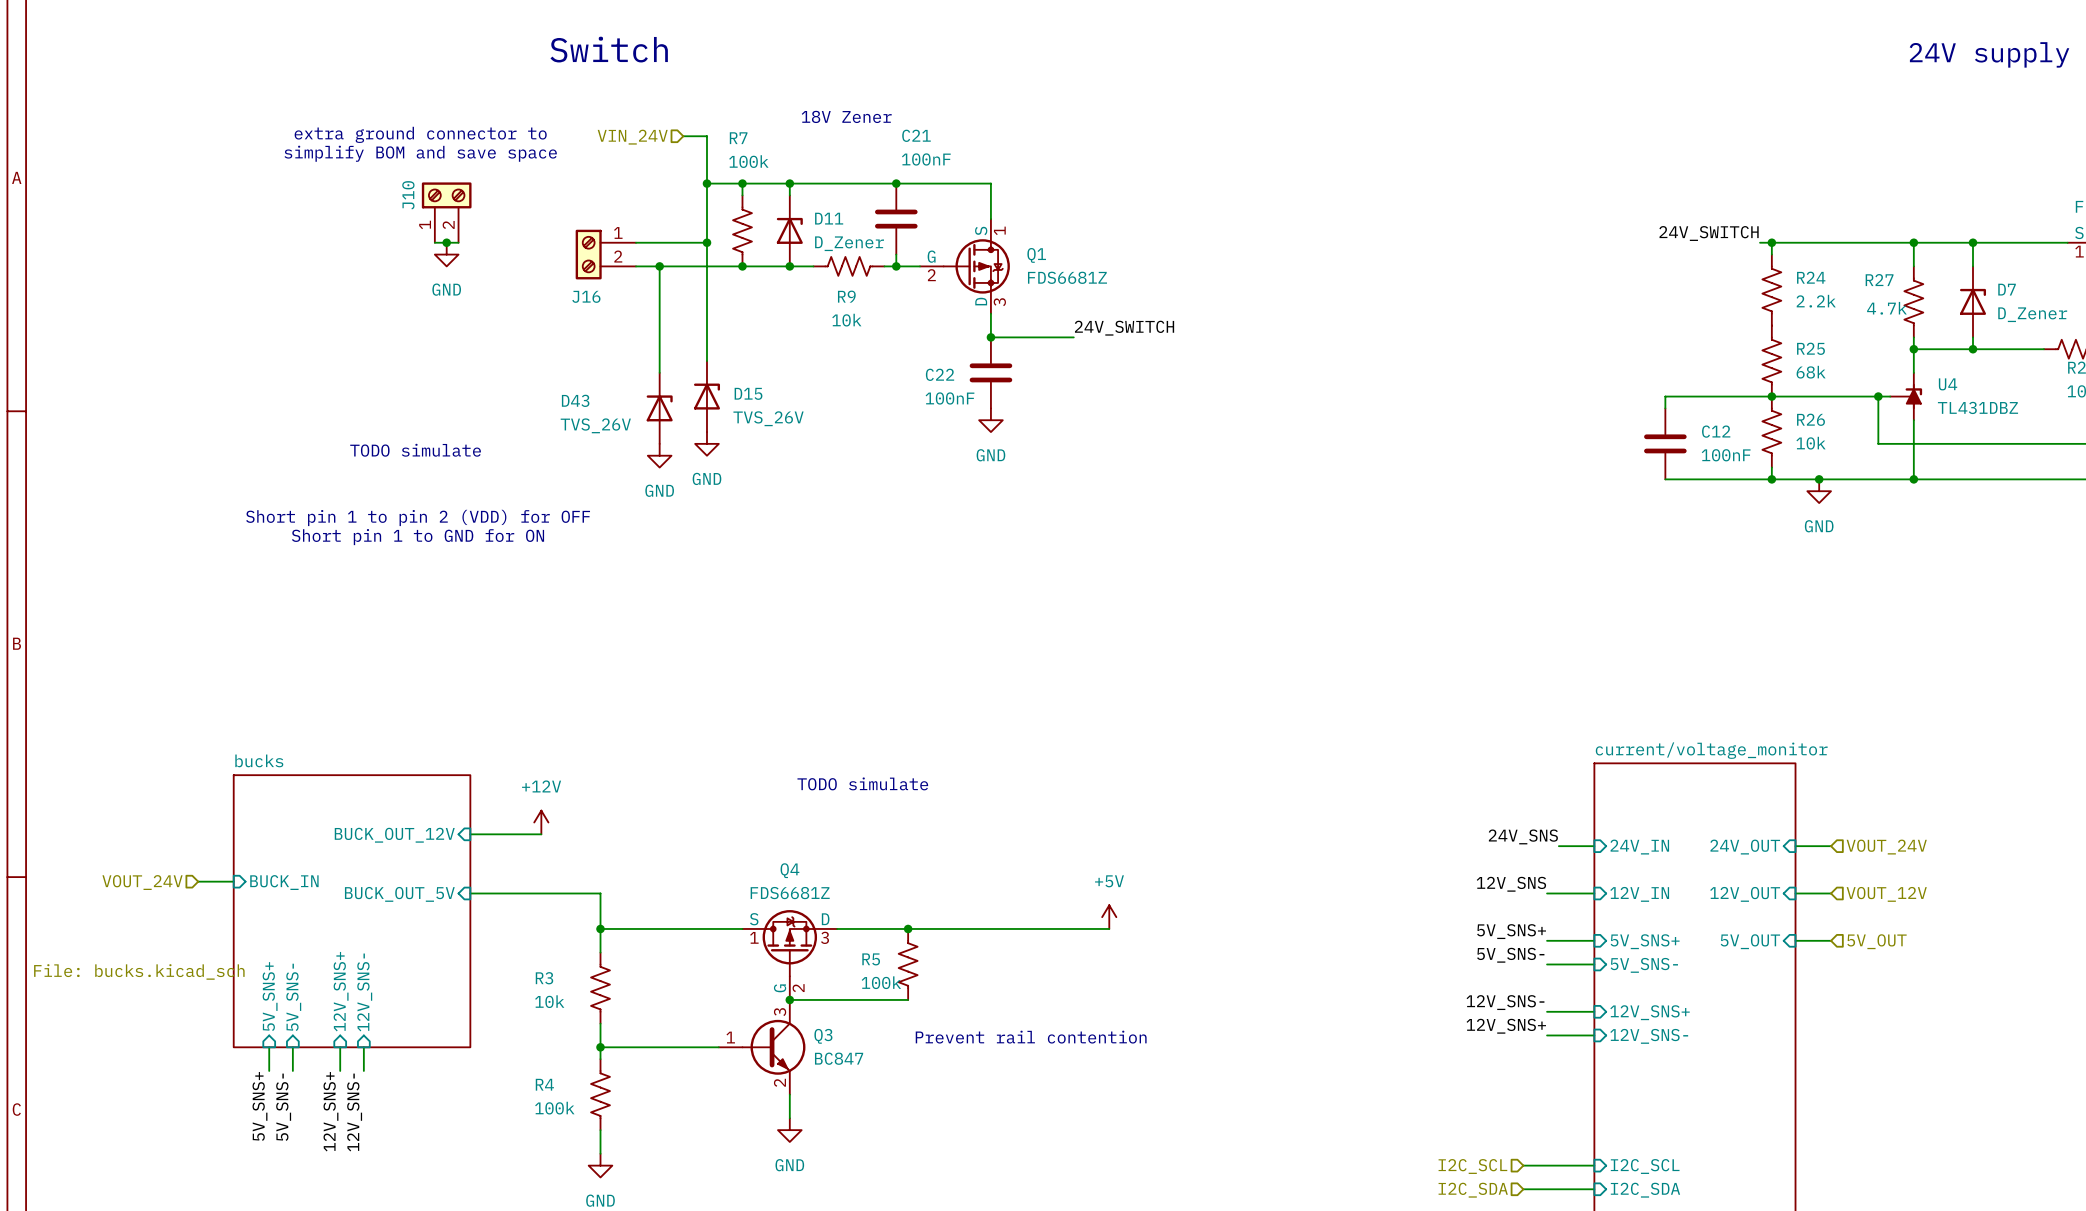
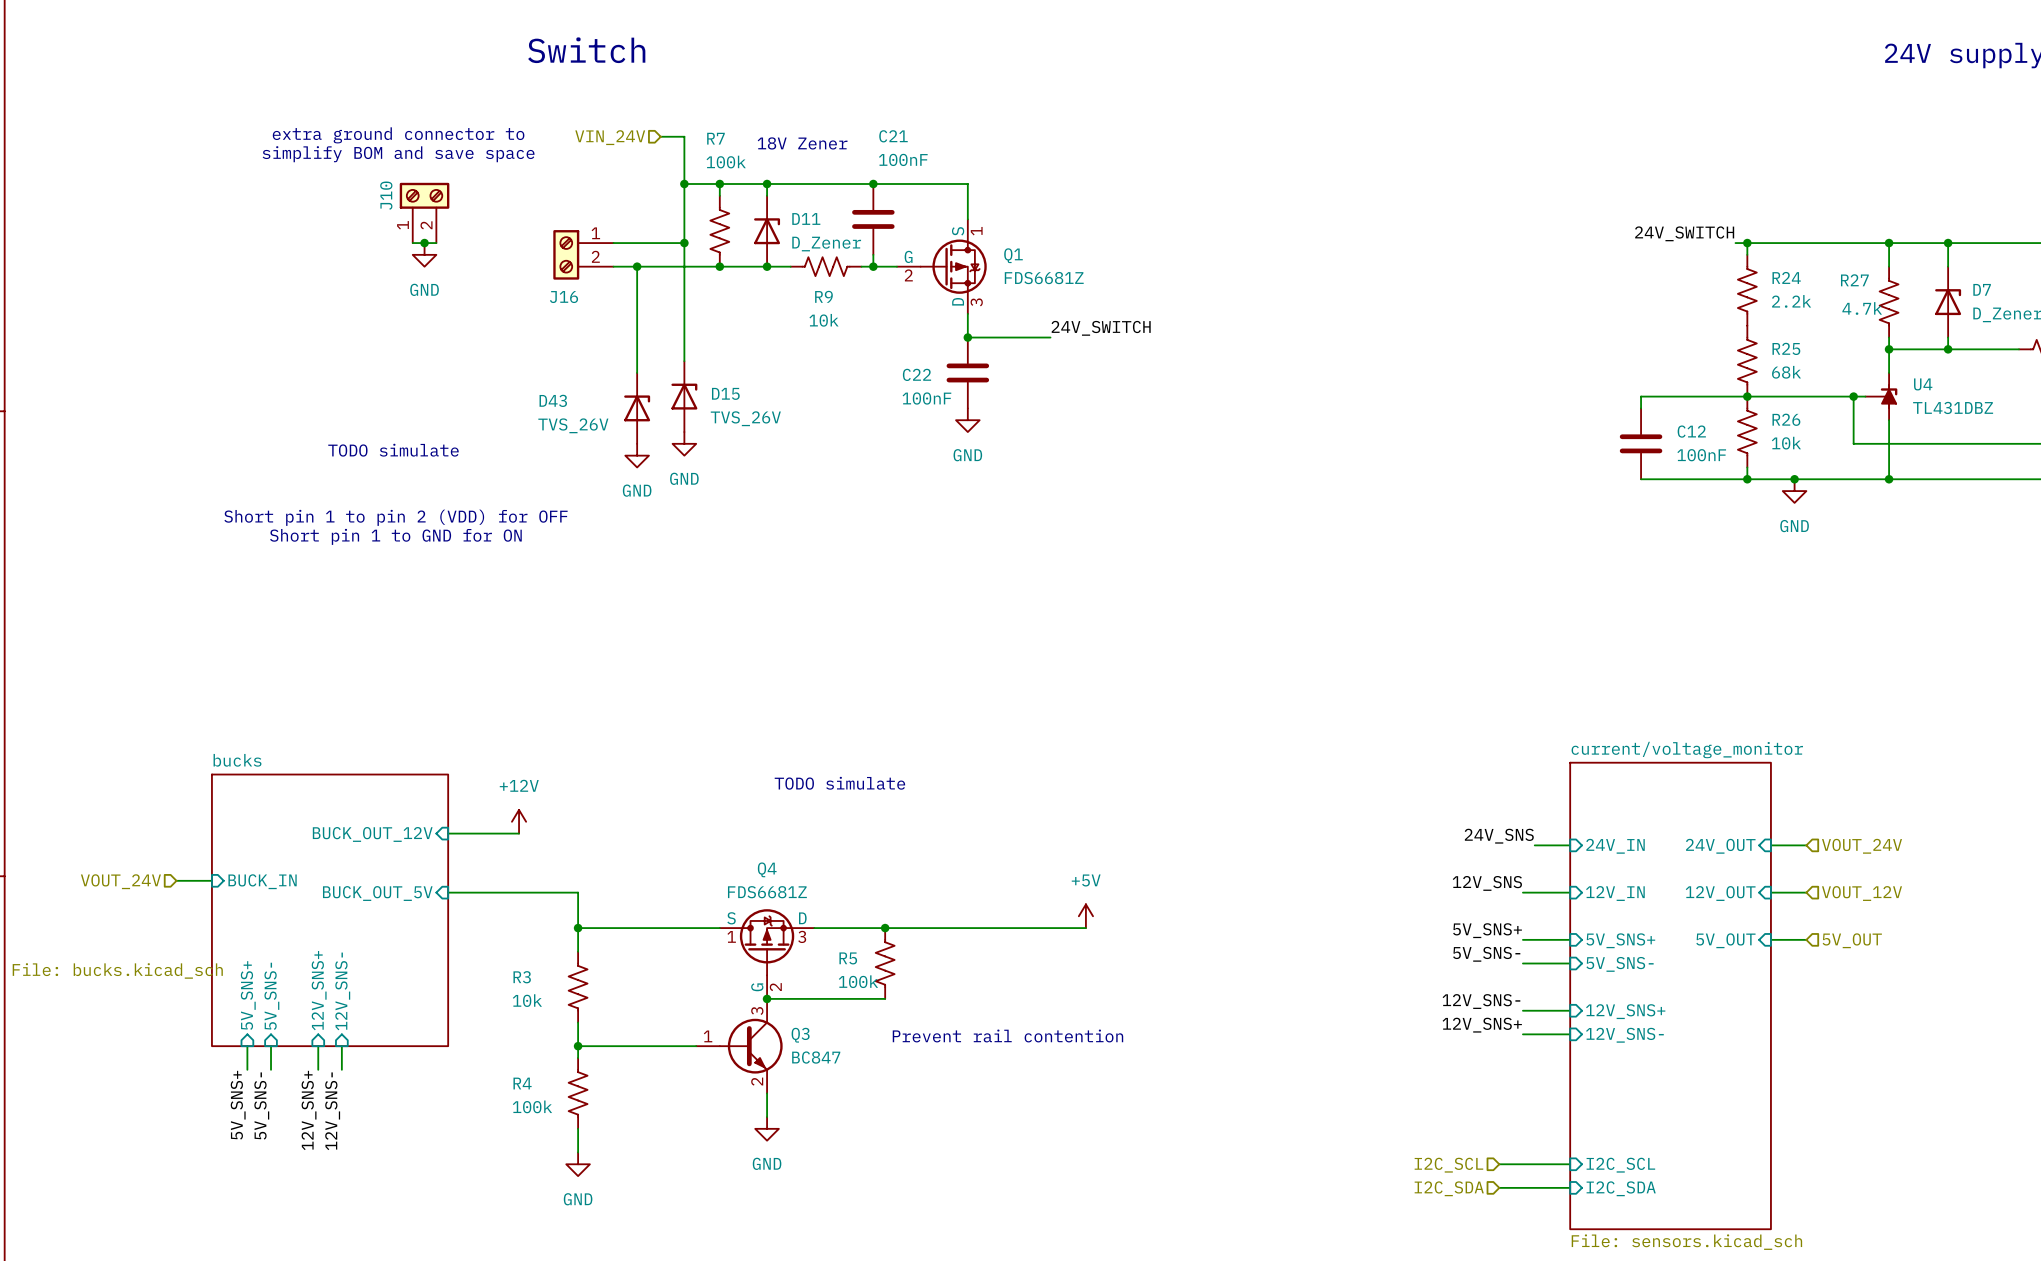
text position: 18V Zener (846, 116) -> 18V Zener (802, 143)

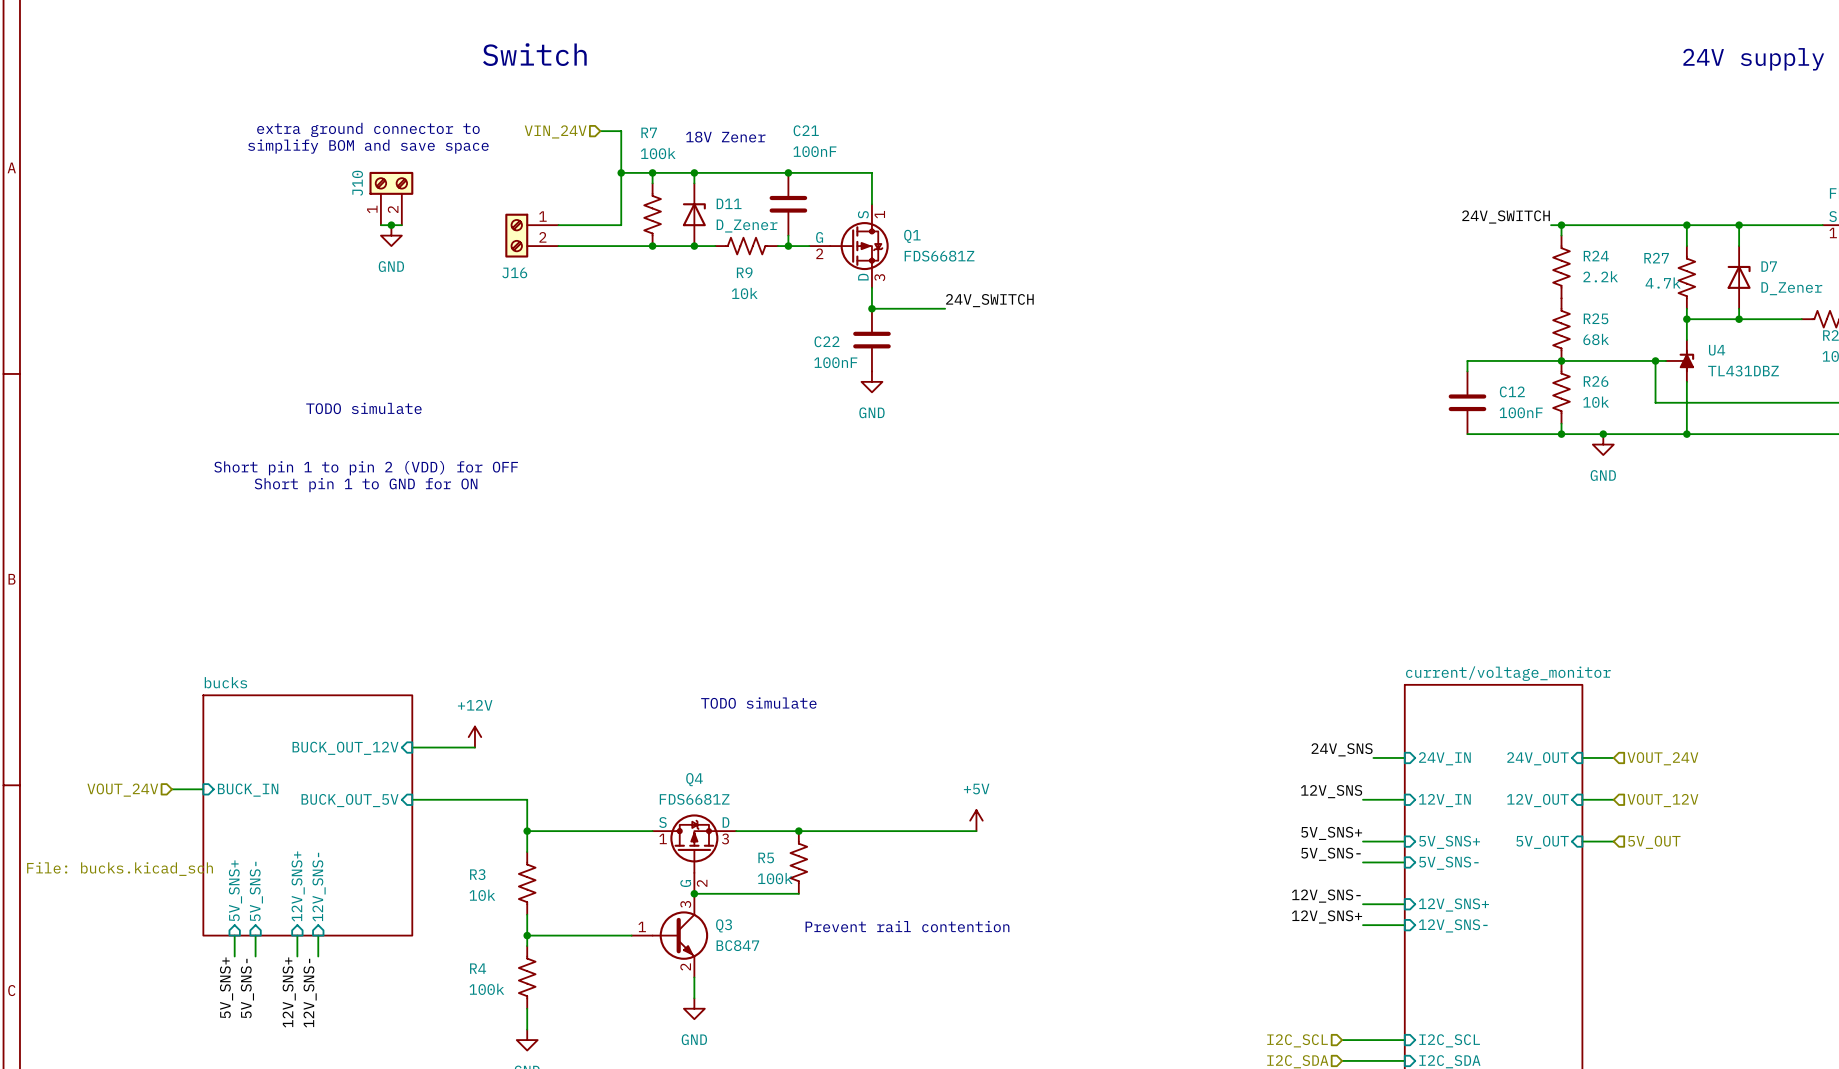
wire: (684, 243) (684, 361) -> none
junction: (684, 243) -> none
wire: (637, 266) (637, 372) -> none
junction: (637, 266) -> none
D15: TVS_26V (684, 396) -> none
D43: TVS_26V (637, 408) -> none
power symbol: GND (684, 443) -> none
power symbol: GND (637, 455) -> none

